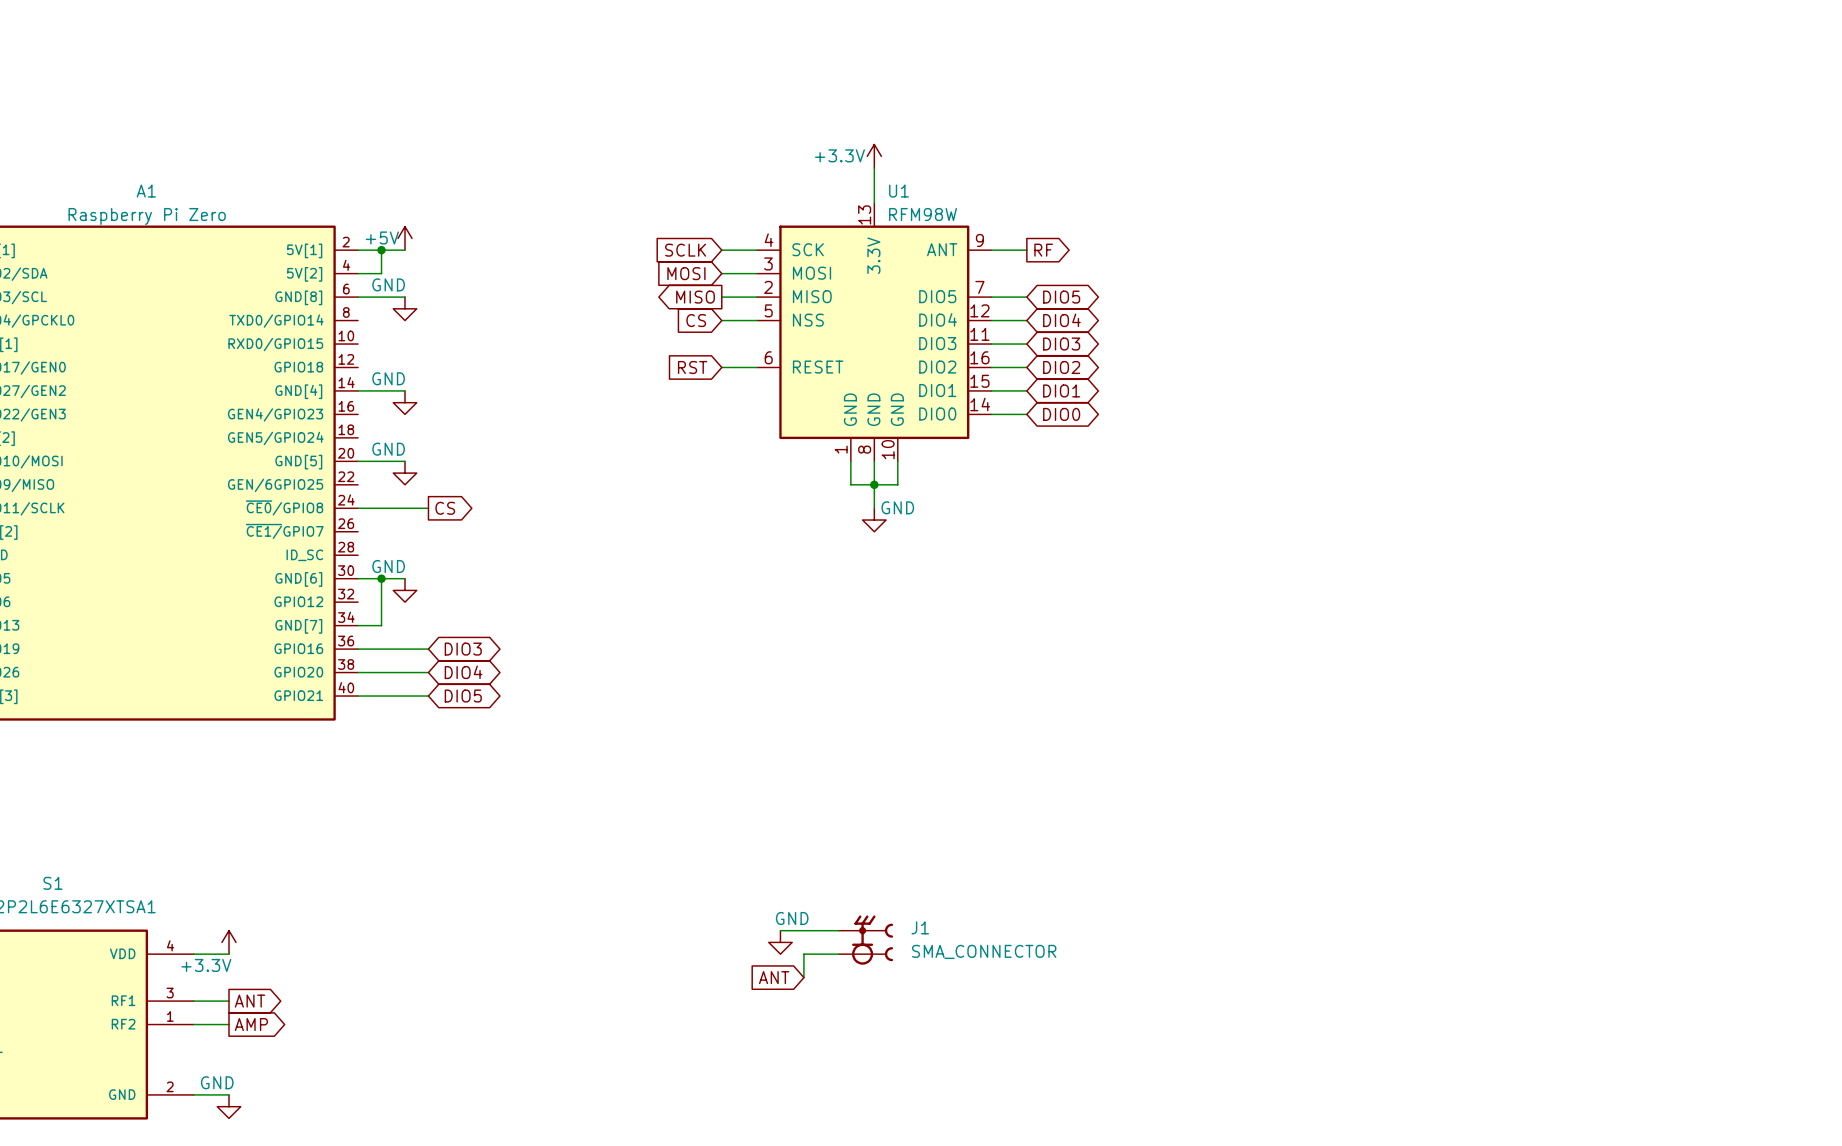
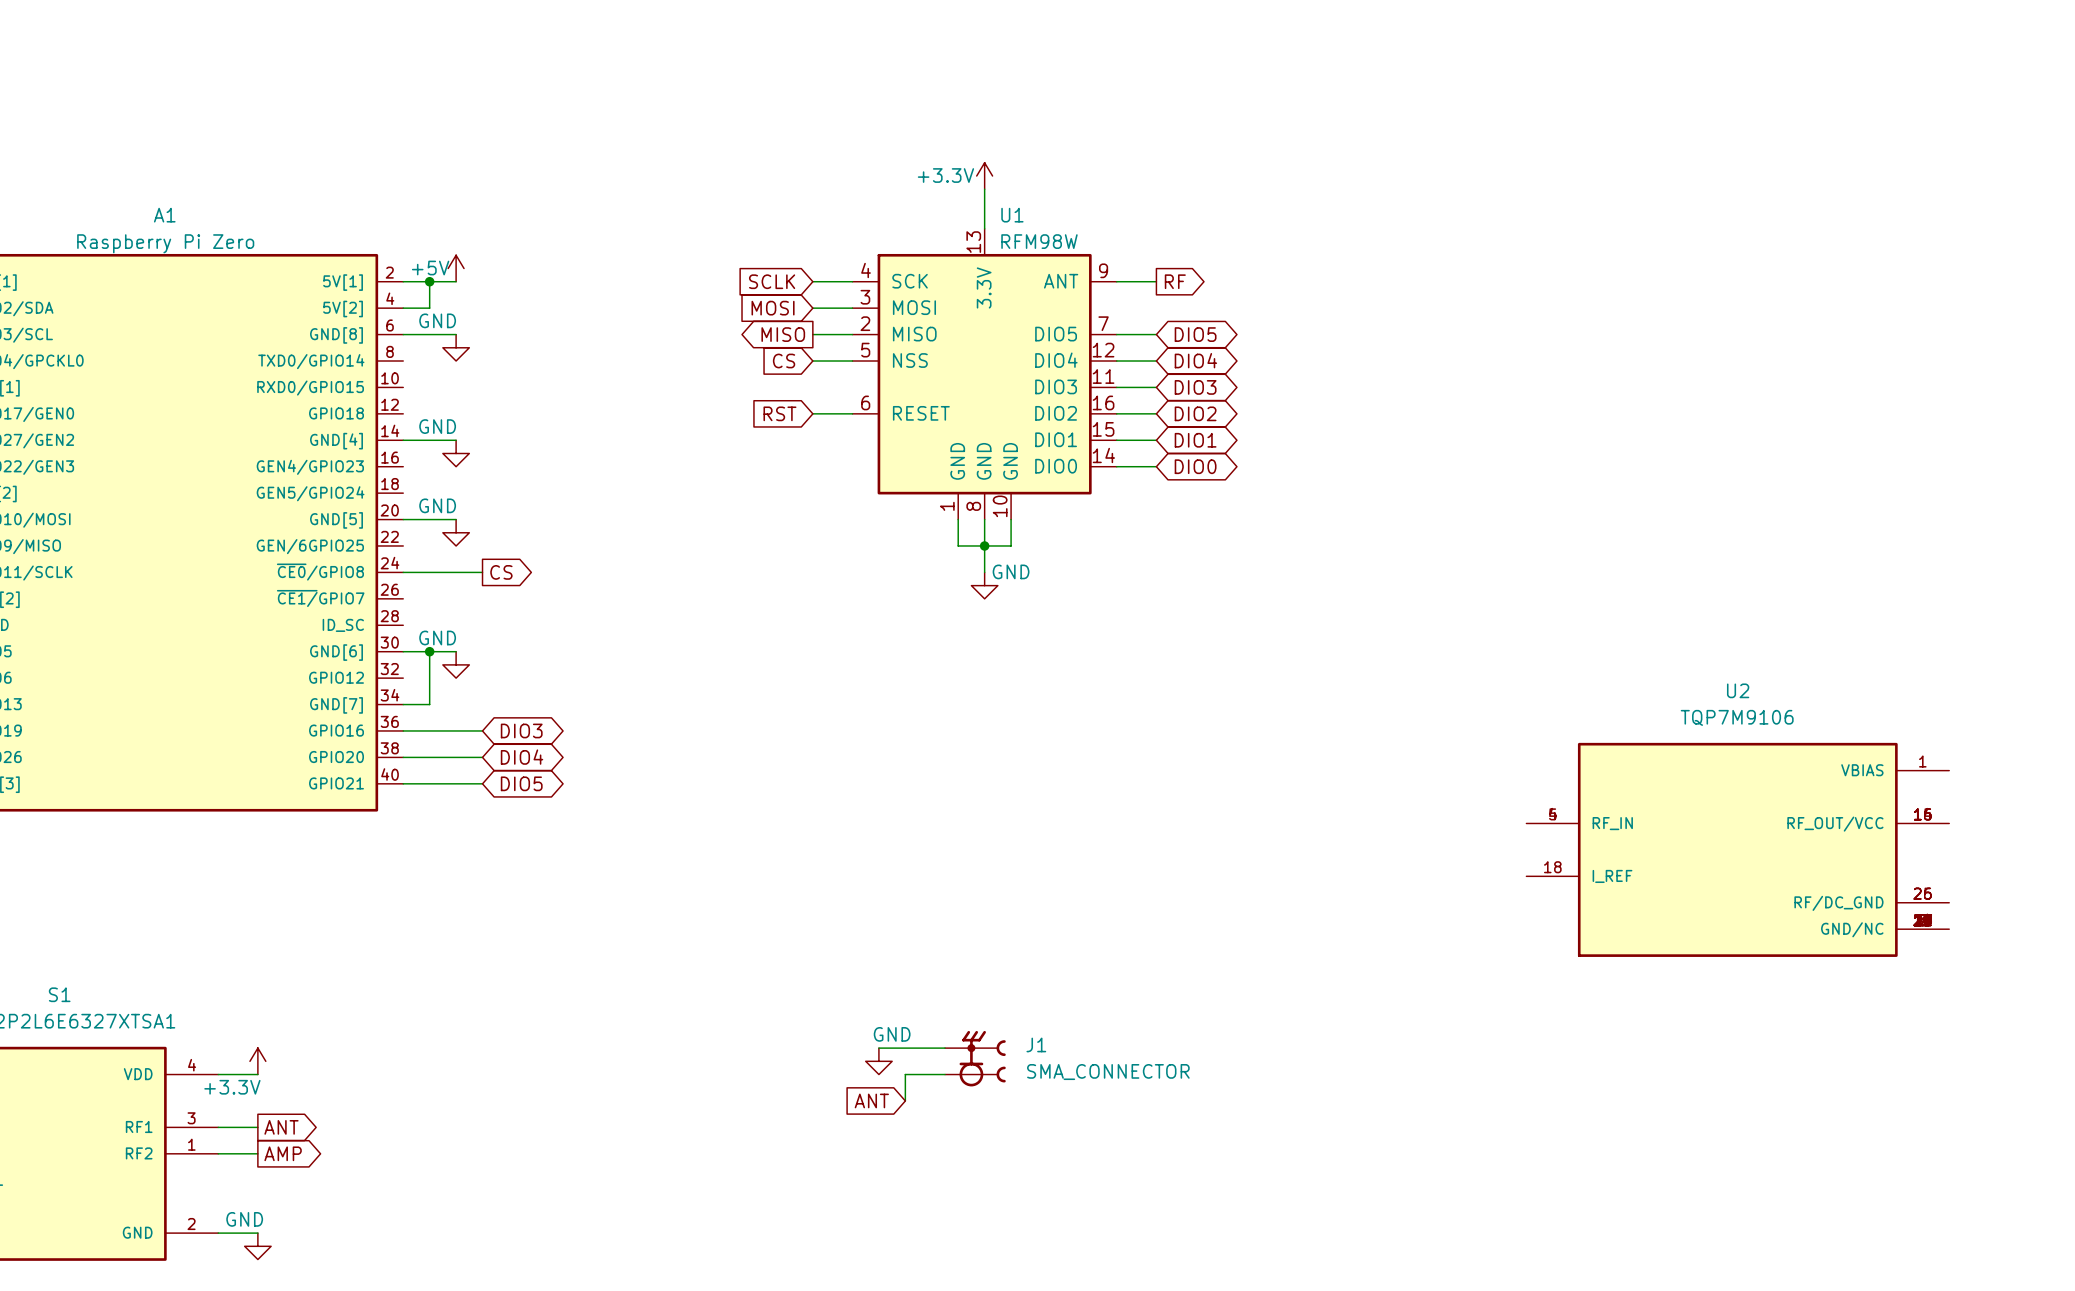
U2: none -> TQP7M9106 (1737, 849)

